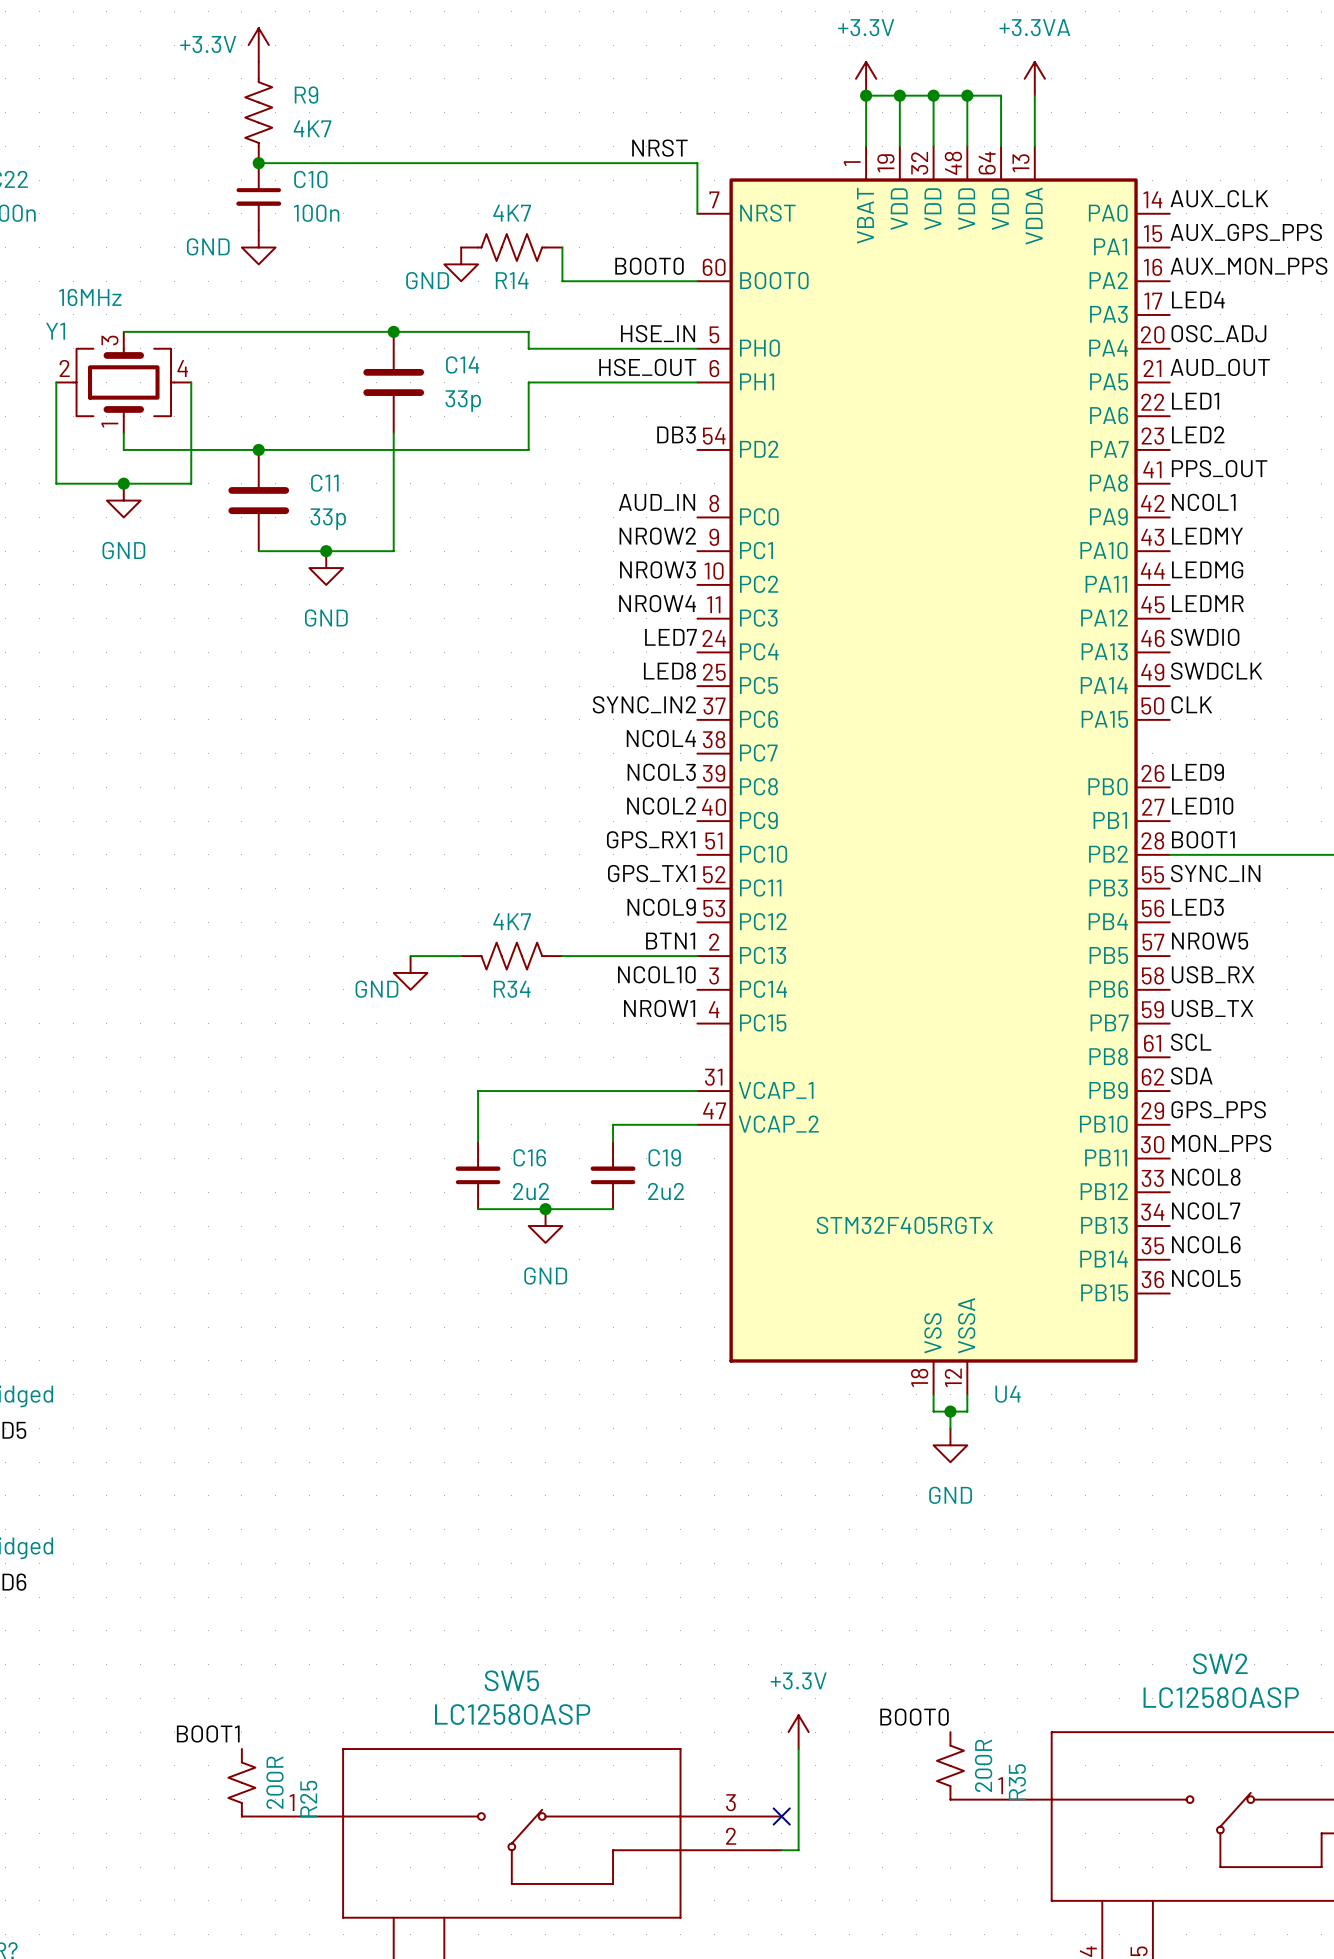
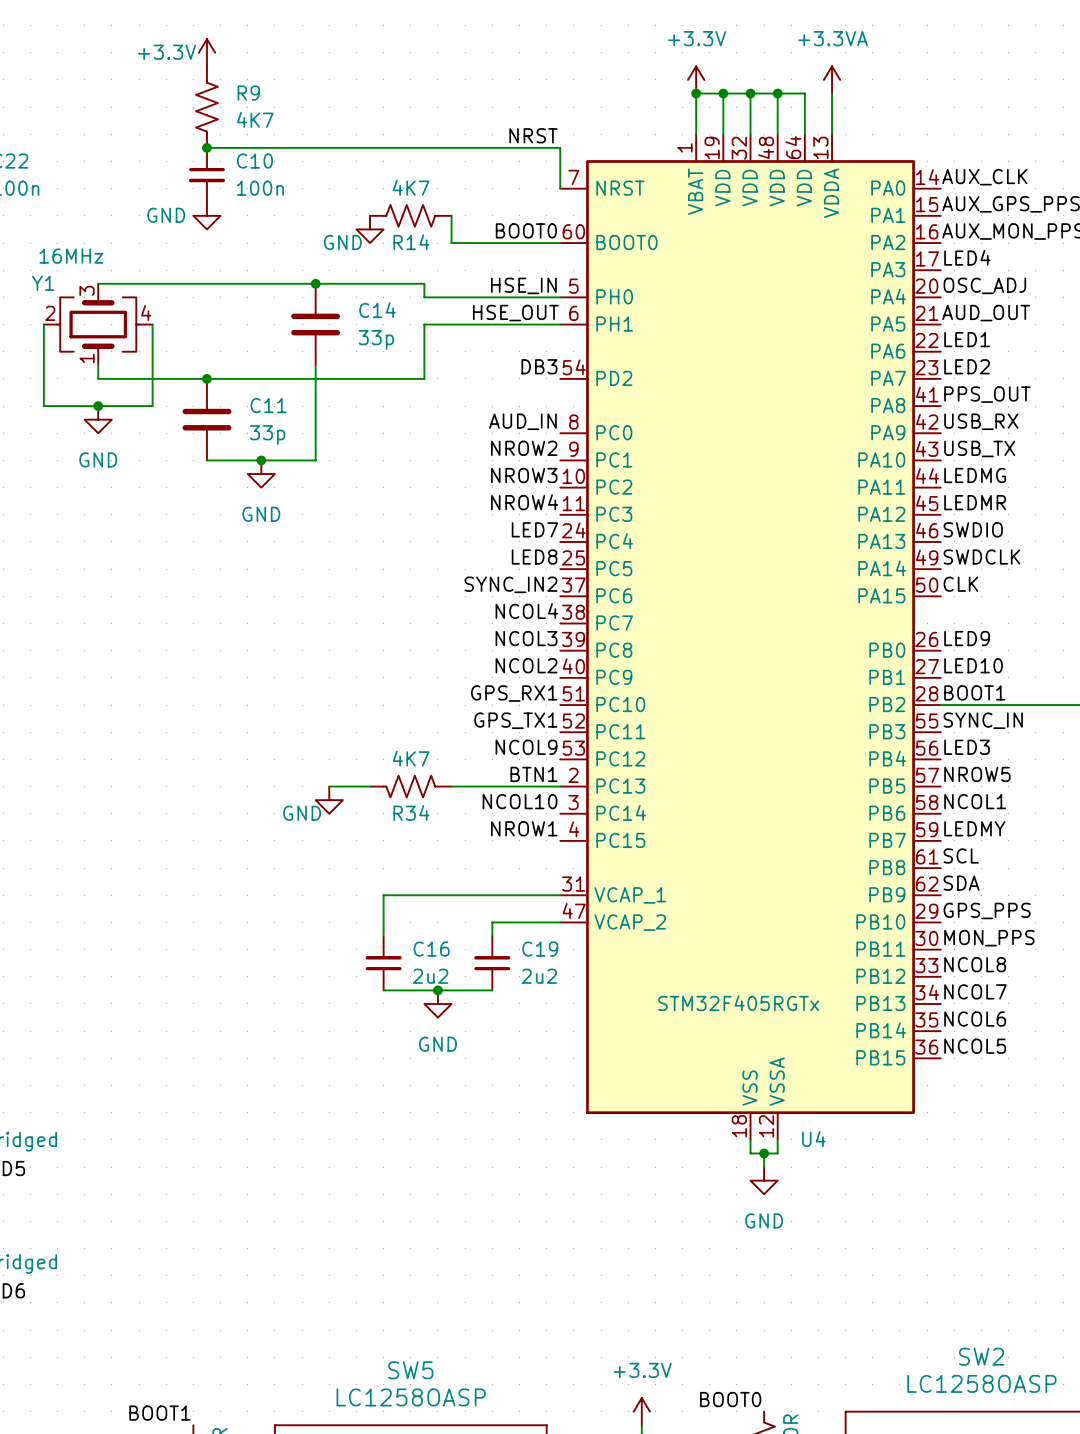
label: NCOL1 (1203, 502) -> USB_RX (981, 421)
label: LEDMY (1207, 536) -> USB_TX (979, 448)
label: USB_RX (1213, 974) -> NCOL1 (975, 801)
label: USB_TX (1212, 1008) -> LEDMY (974, 828)

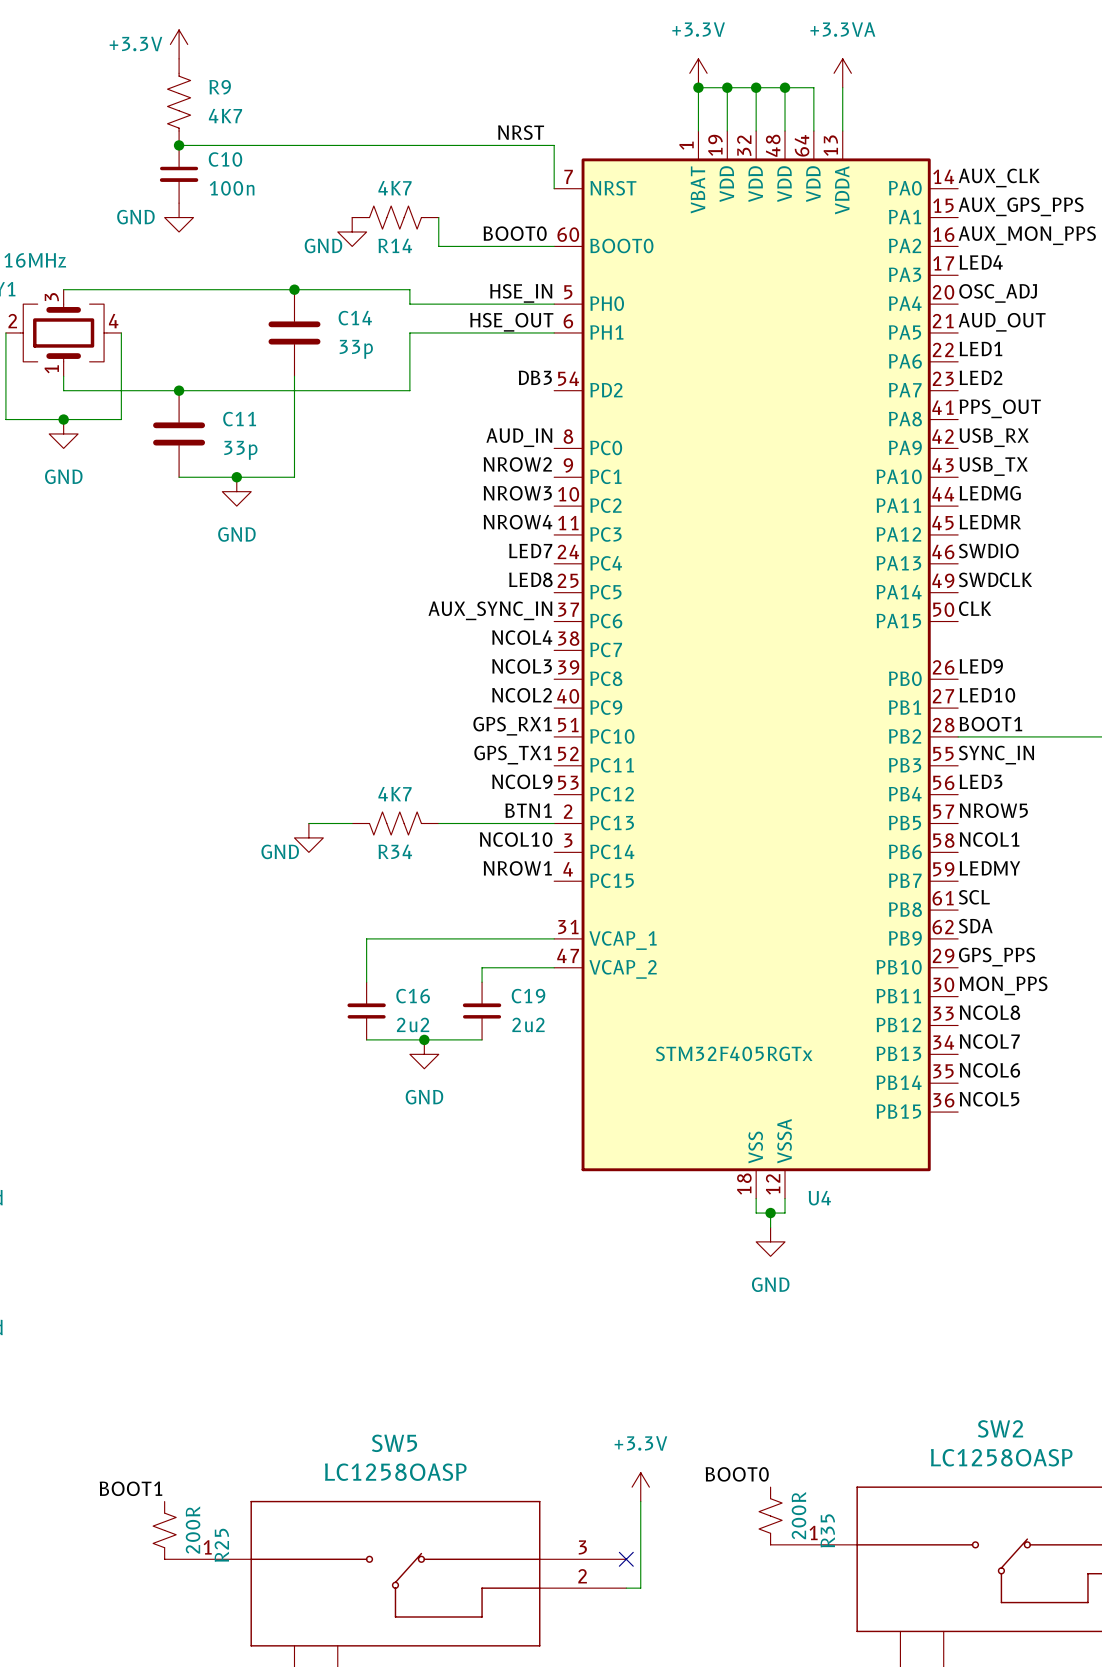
label: SYNC_IN2 (510, 584) -> AUX_SYNC_IN (490, 610)

